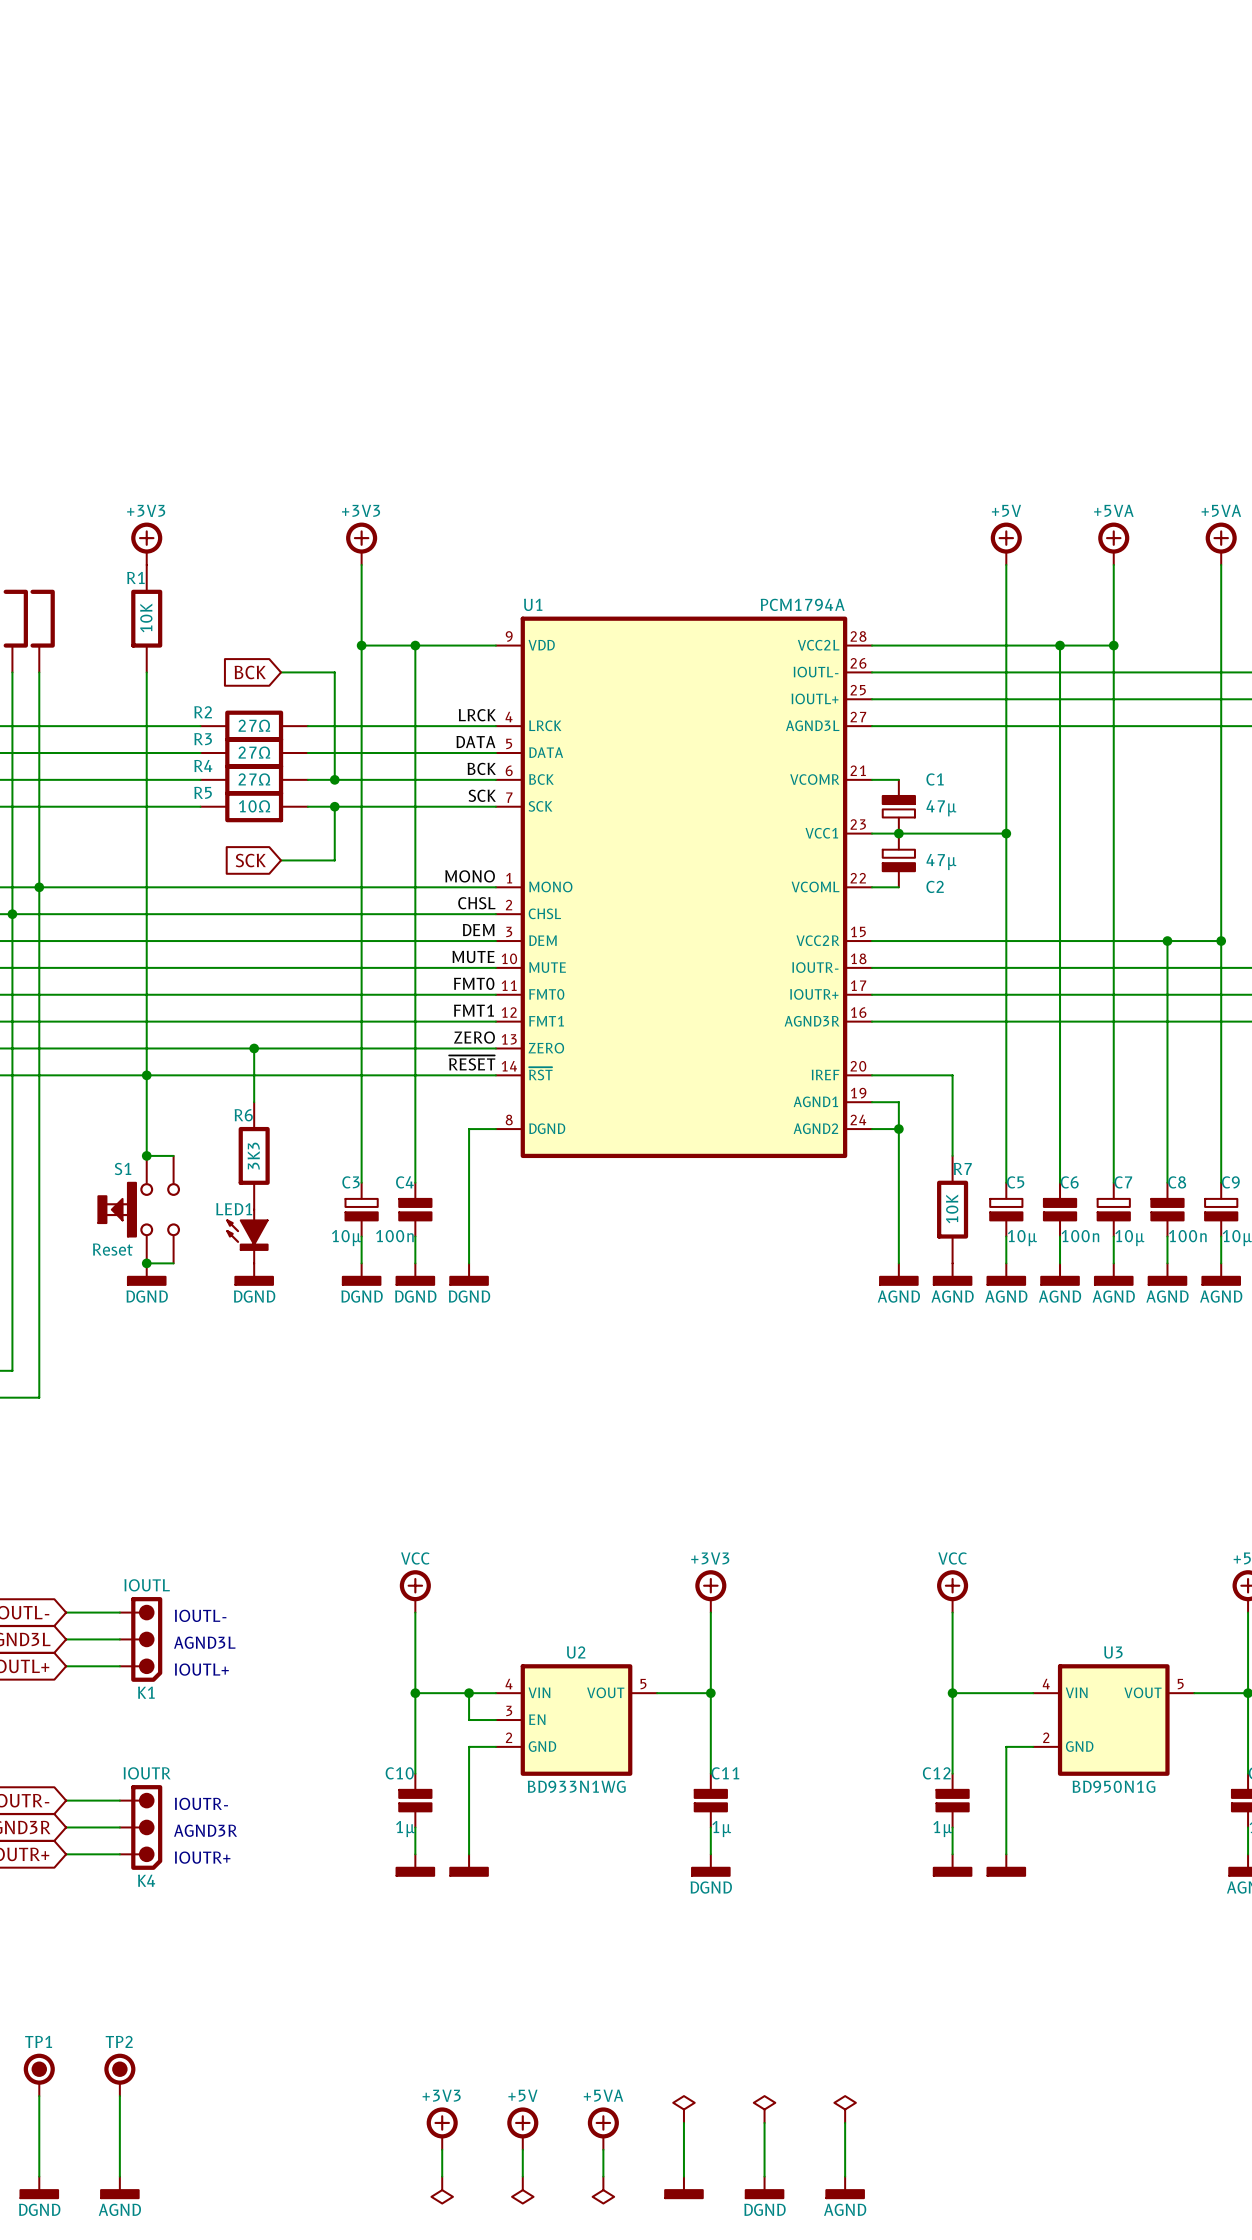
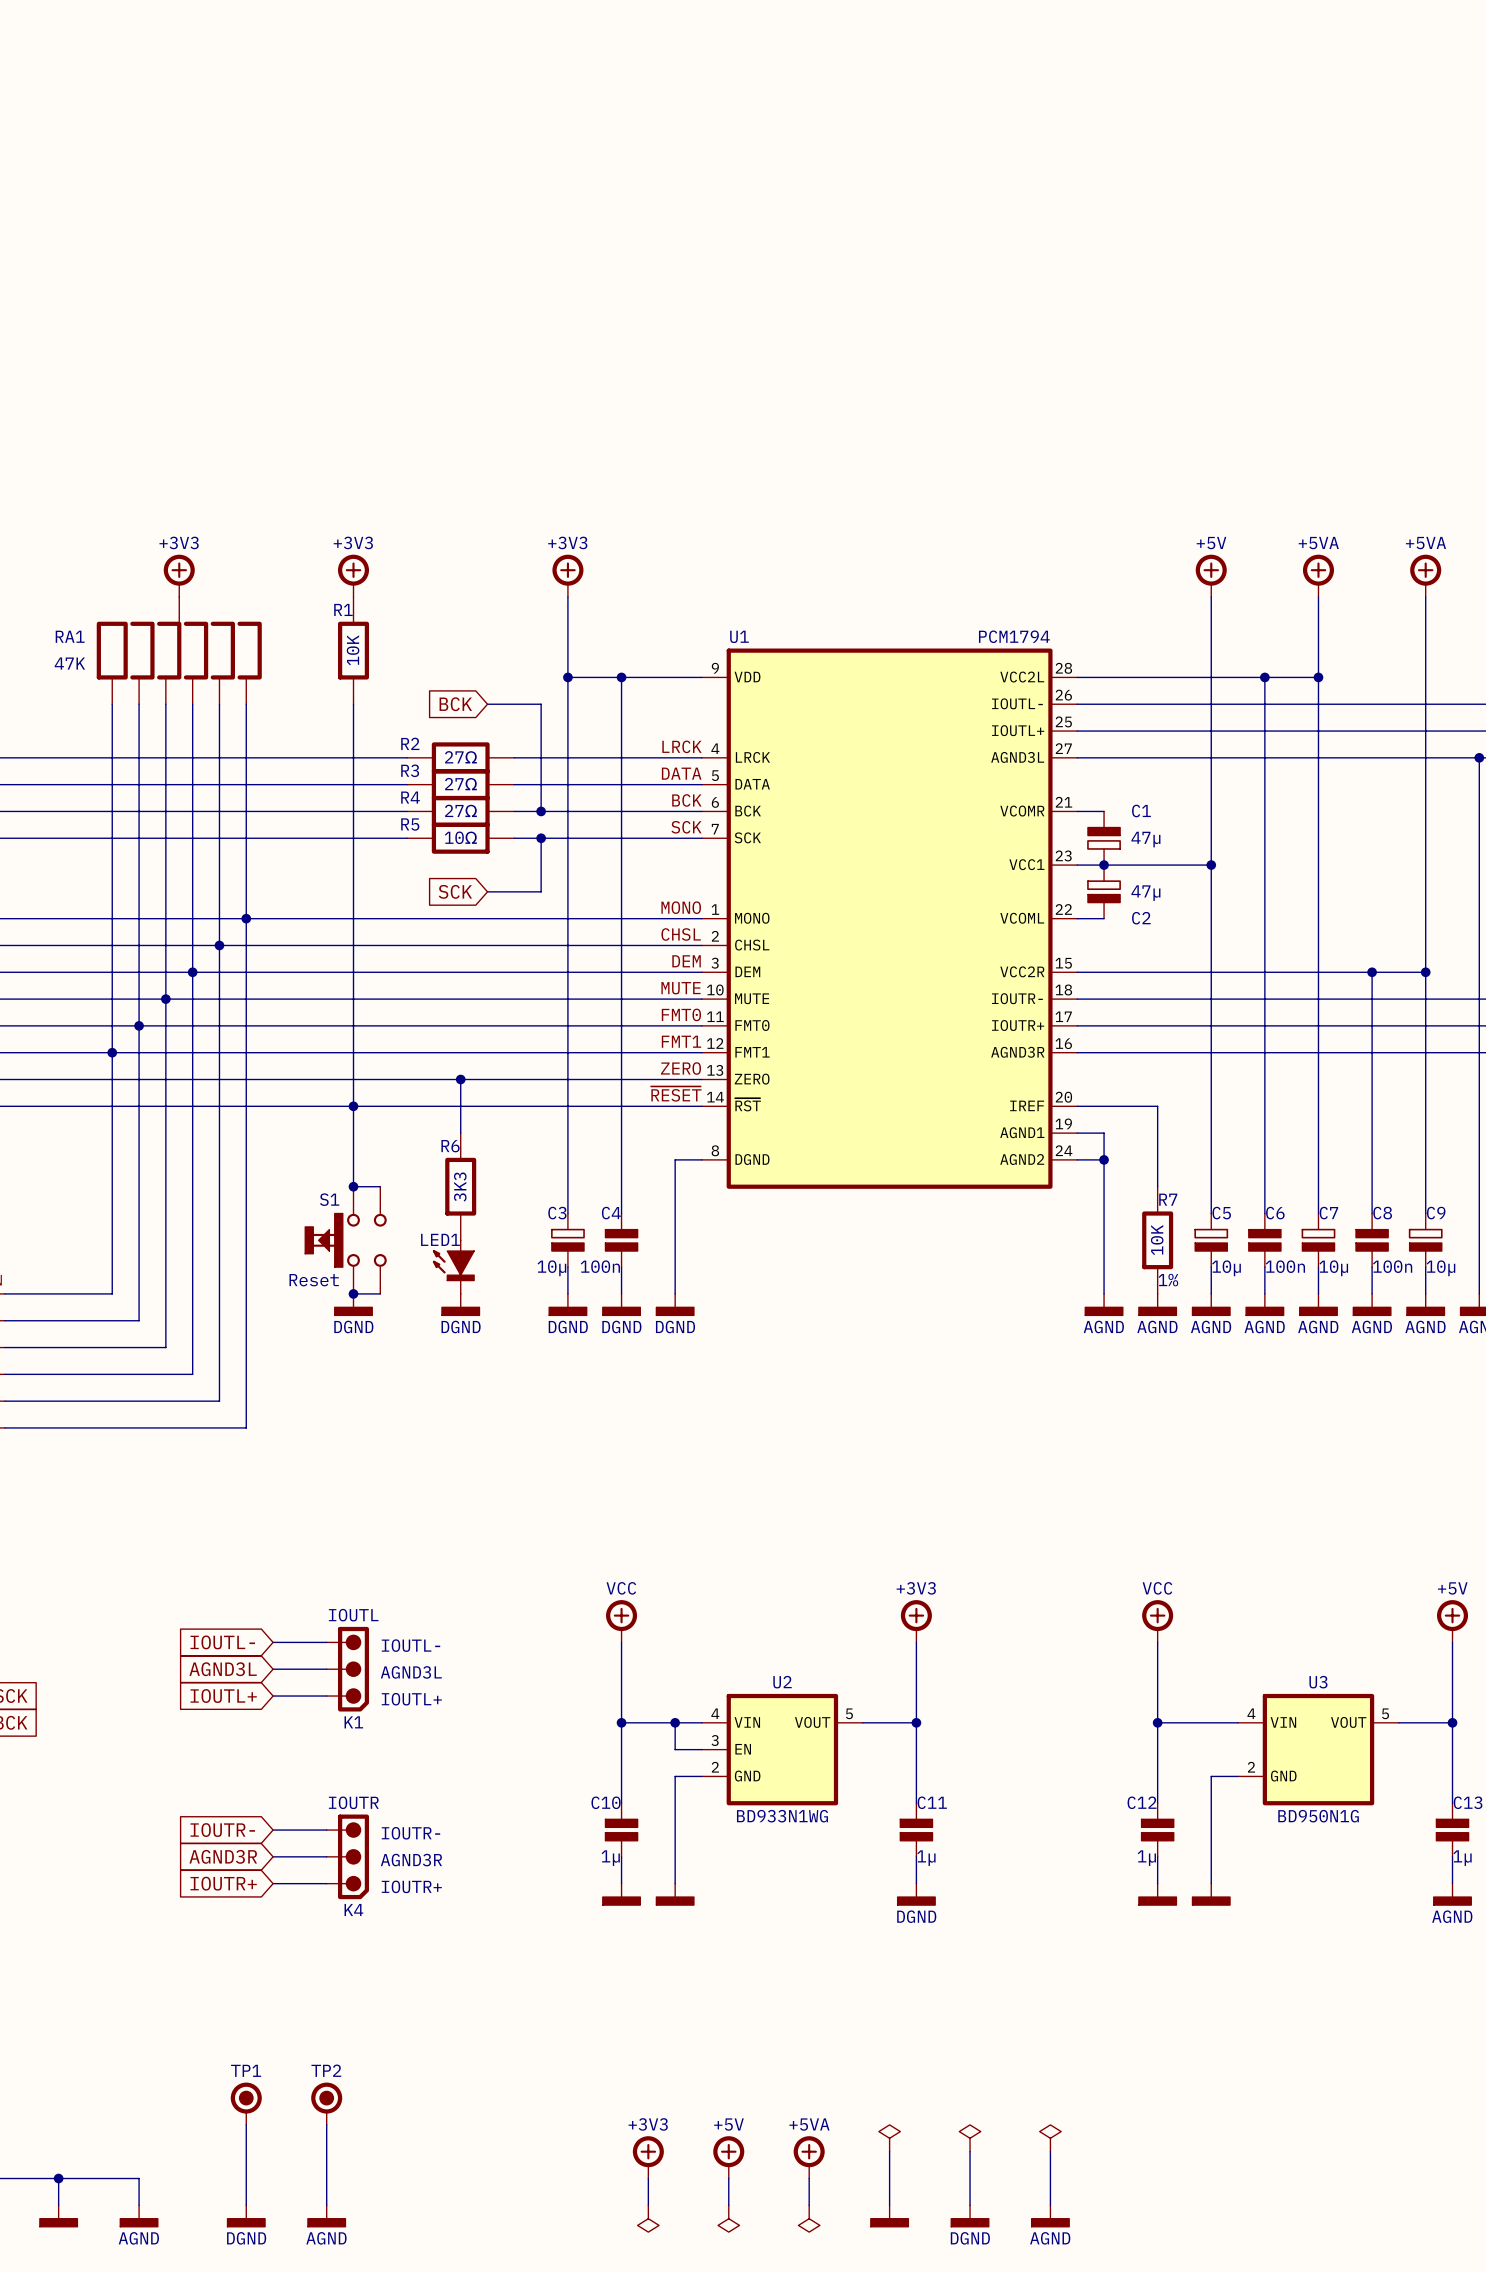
U1 value: PCM1794A (802, 604) -> PCM1794 (1014, 636)
R7 text: none -> 1% (1168, 1280)

